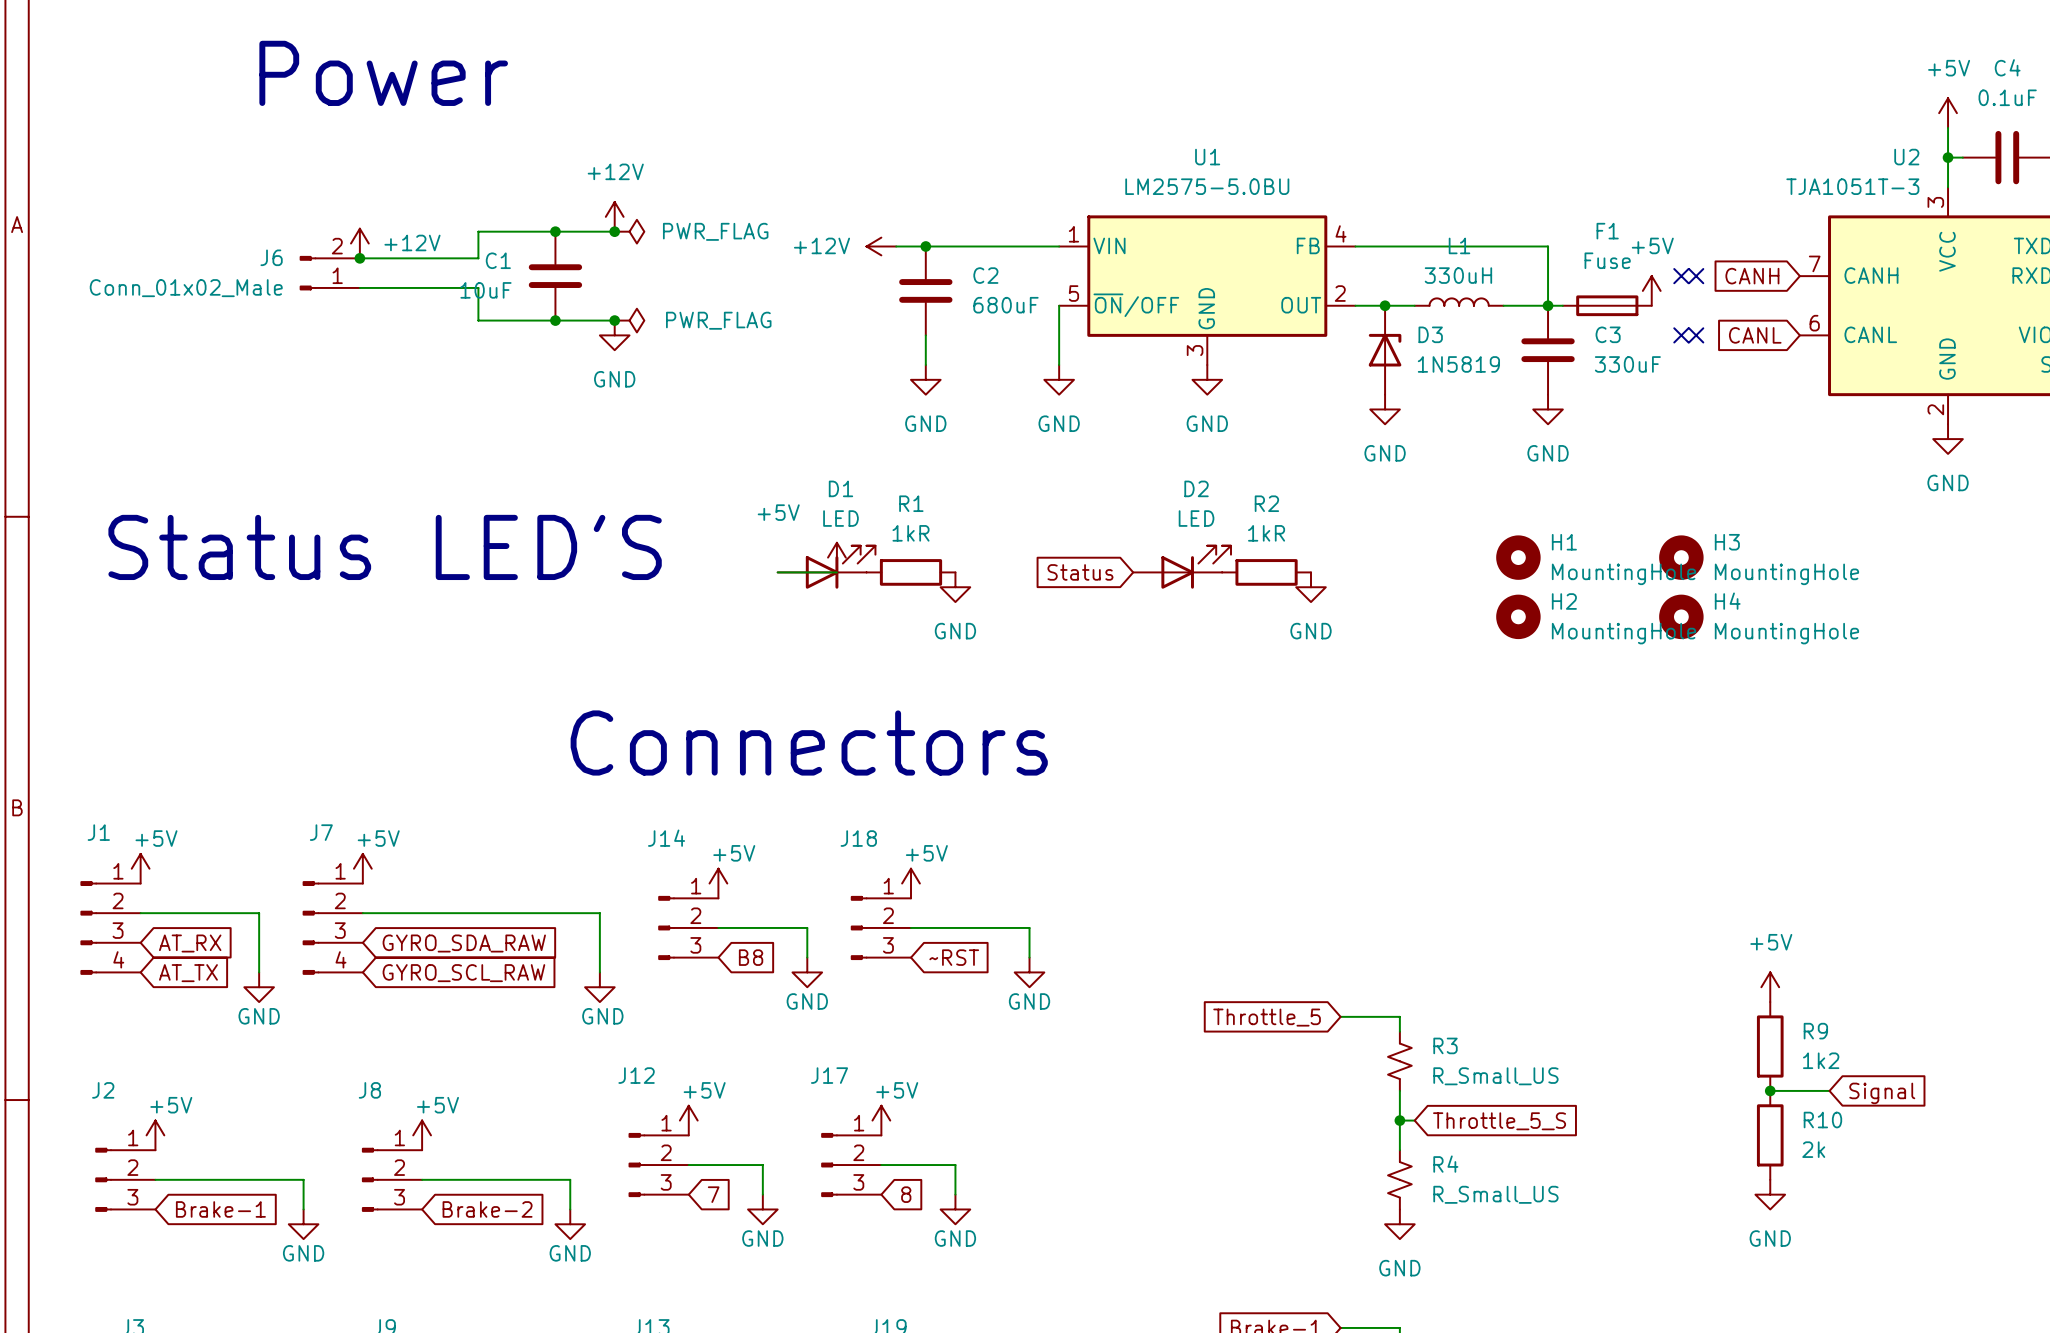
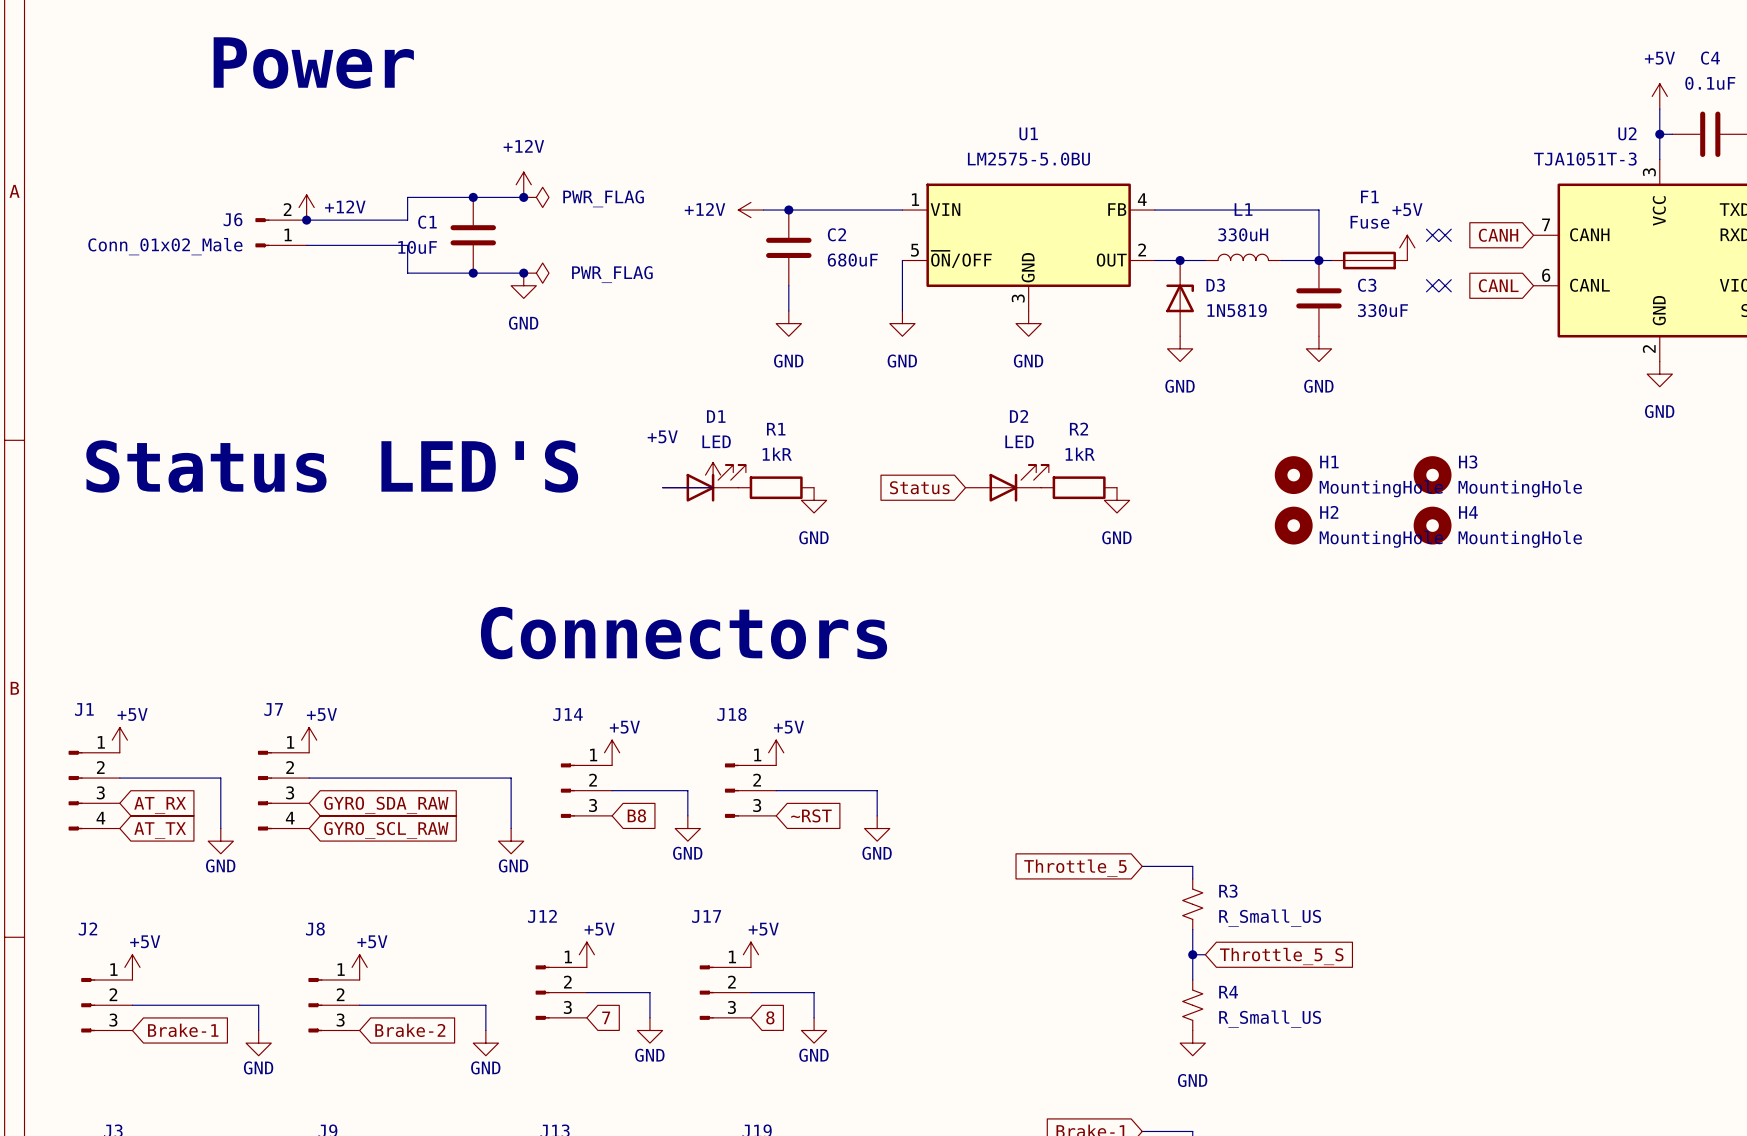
power symbol: +5V (1770, 987) -> none
R9: 1k2 (1770, 1046) -> none
wire: (1770, 1090) (1829, 1090) -> none
junction: (1770, 1090) -> none
global label: Signal (1882, 1093) -> none
R10: 2k (1770, 1135) -> none
power symbol: GND (1770, 1194) -> none

